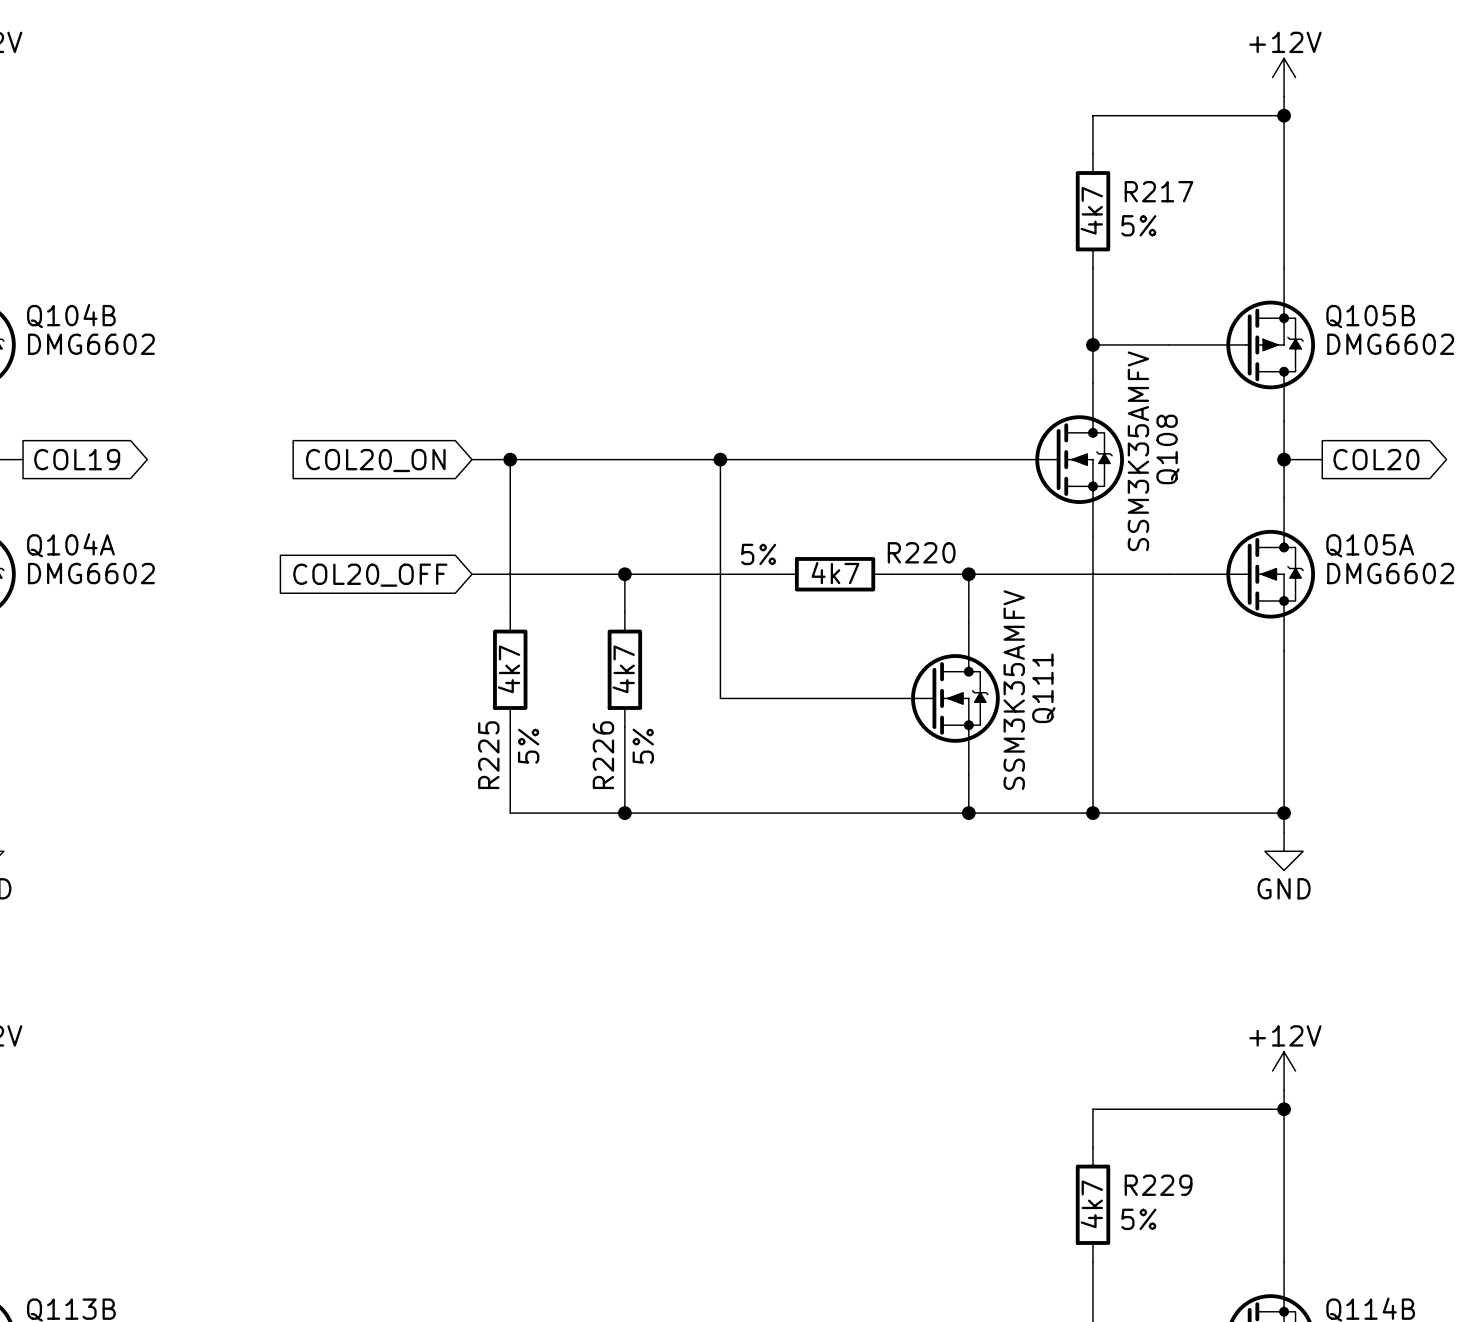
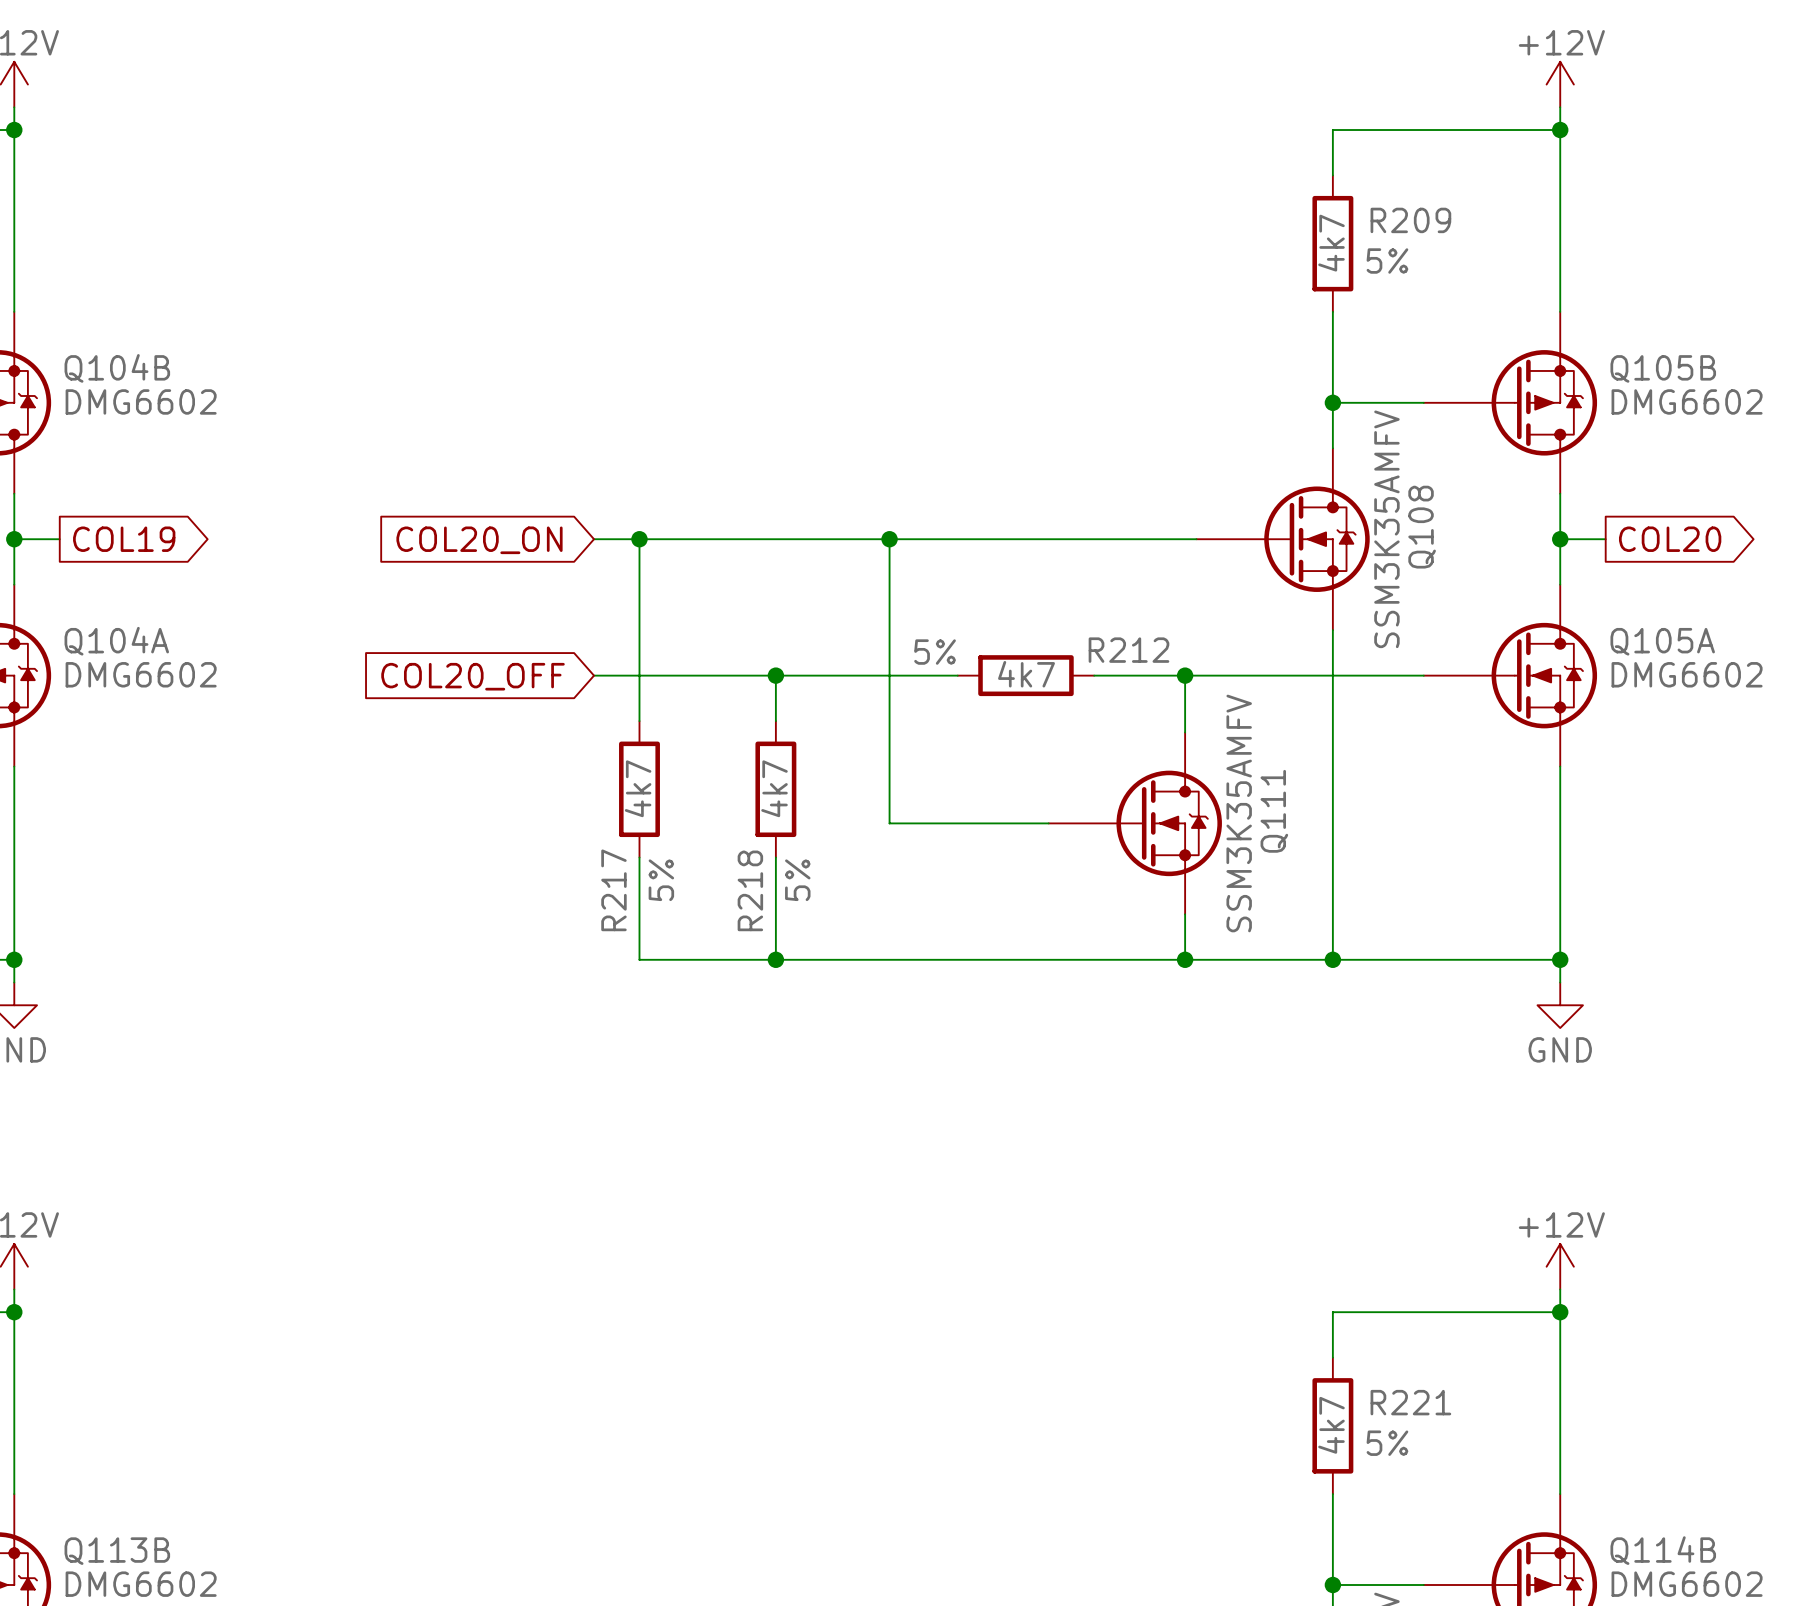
R217 name: R217 (1159, 191) -> R209 (1410, 220)
R220 name: R220 (921, 552) -> R212 (1128, 650)
R225 name: R225 (488, 755) -> R217 (613, 890)
R226 name: R226 (603, 755) -> R218 (750, 890)
R229 name: R229 (1158, 1185) -> R221 (1410, 1402)

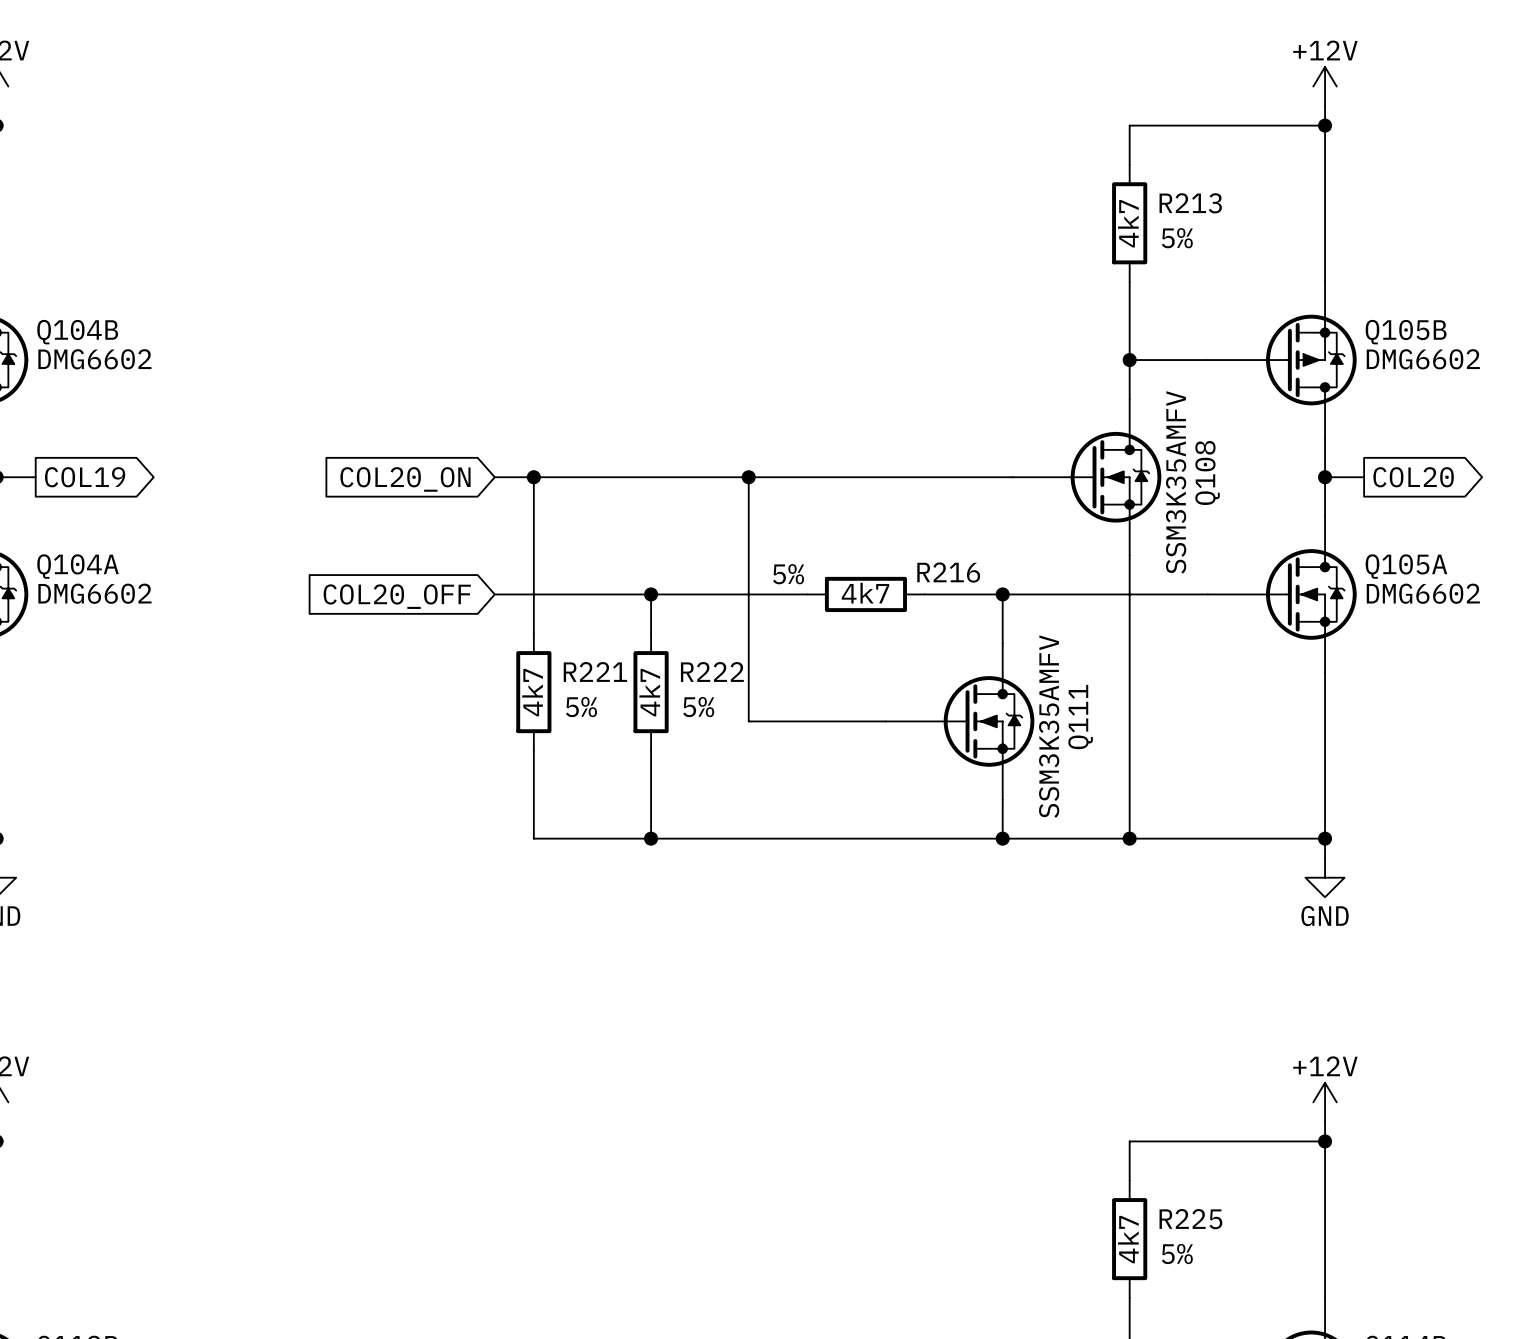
R209 name: R209 (1410, 220) -> R213 (1190, 203)
R212 name: R212 (1128, 650) -> R216 (948, 572)
R217 text rotation: 0° (661, 880) -> 90° clockwise (581, 707)
R217 text position: 5% (661, 880) -> 5% (581, 707)
R218 text rotation: 0° (797, 880) -> 90° clockwise (698, 707)
R218 text position: 5% (797, 880) -> 5% (698, 707)
R217 name: R217 (613, 890) -> R221 (595, 671)
R218 name: R218 (750, 890) -> R222 (712, 671)
R221 name: R221 (1410, 1402) -> R225 (1190, 1219)

